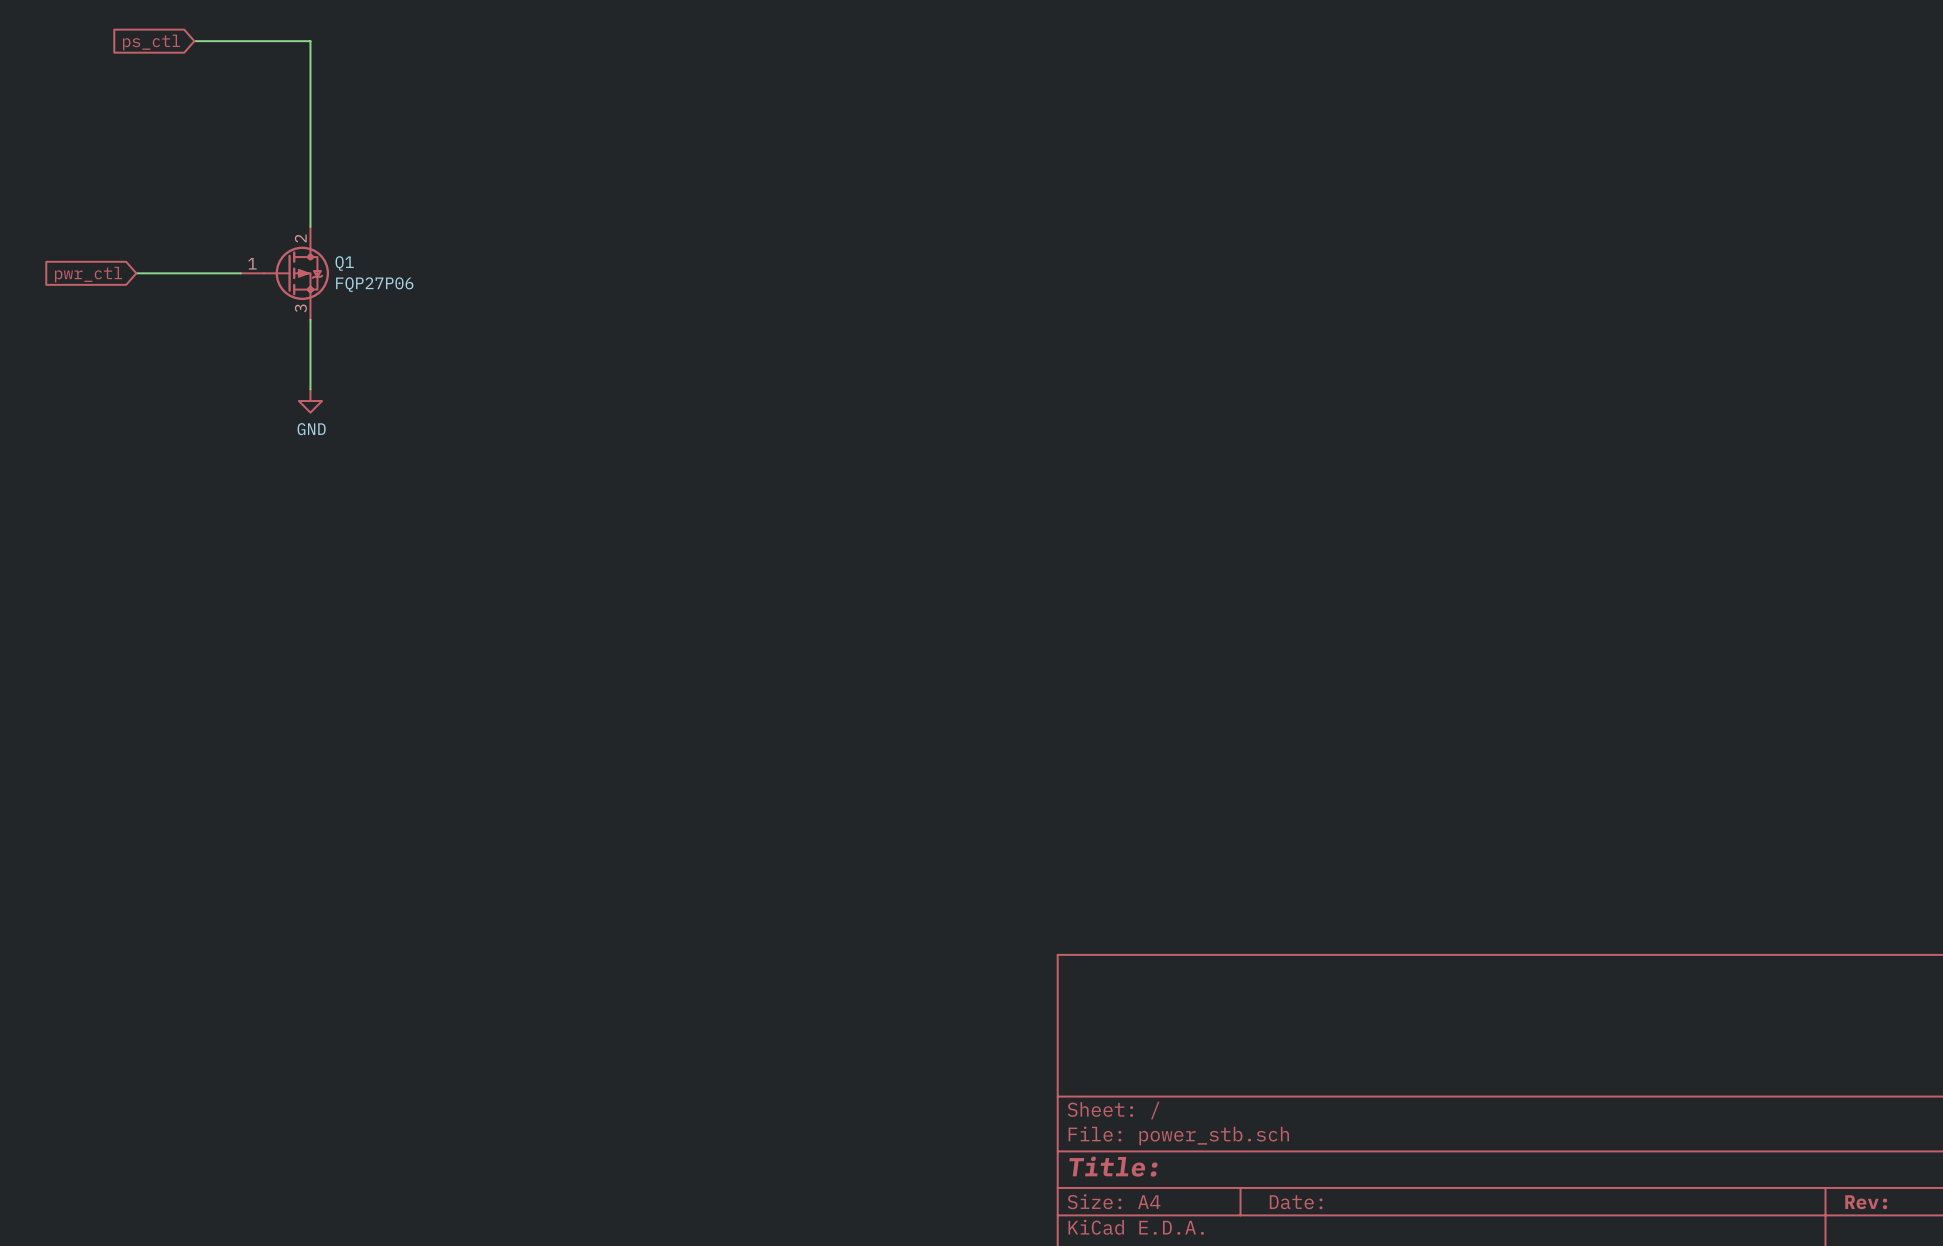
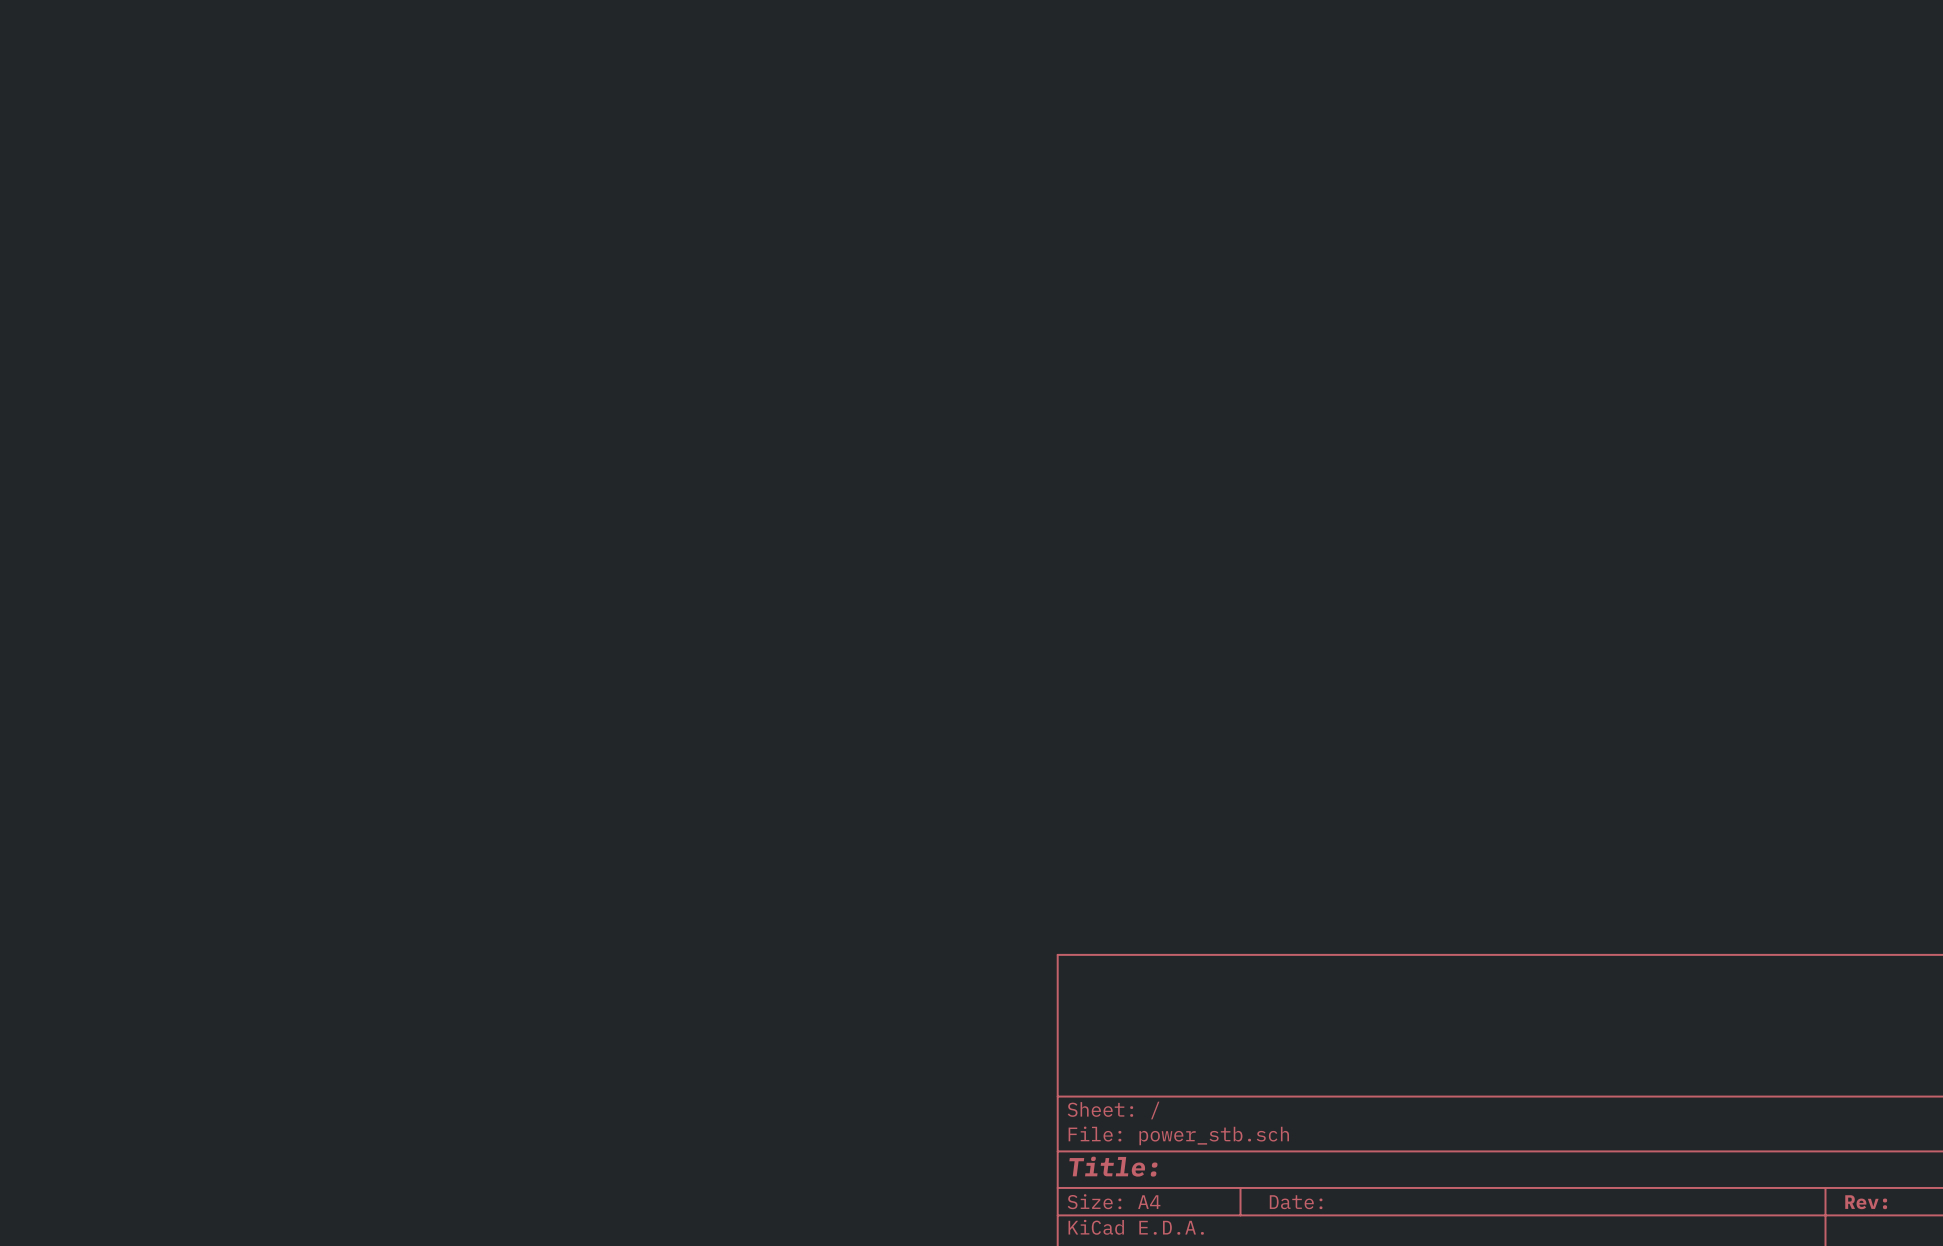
wire: (194, 41) (310, 41) (310, 226) -> none
global label: ps_ctl (151, 42) -> none
wire: (136, 273) (240, 273) -> none
Q1: FQP27P06 (284, 273) -> none
global label: pwr_ctl (88, 274) -> none
wire: (310, 319) (310, 389) -> none
power symbol: GND (310, 401) -> none

